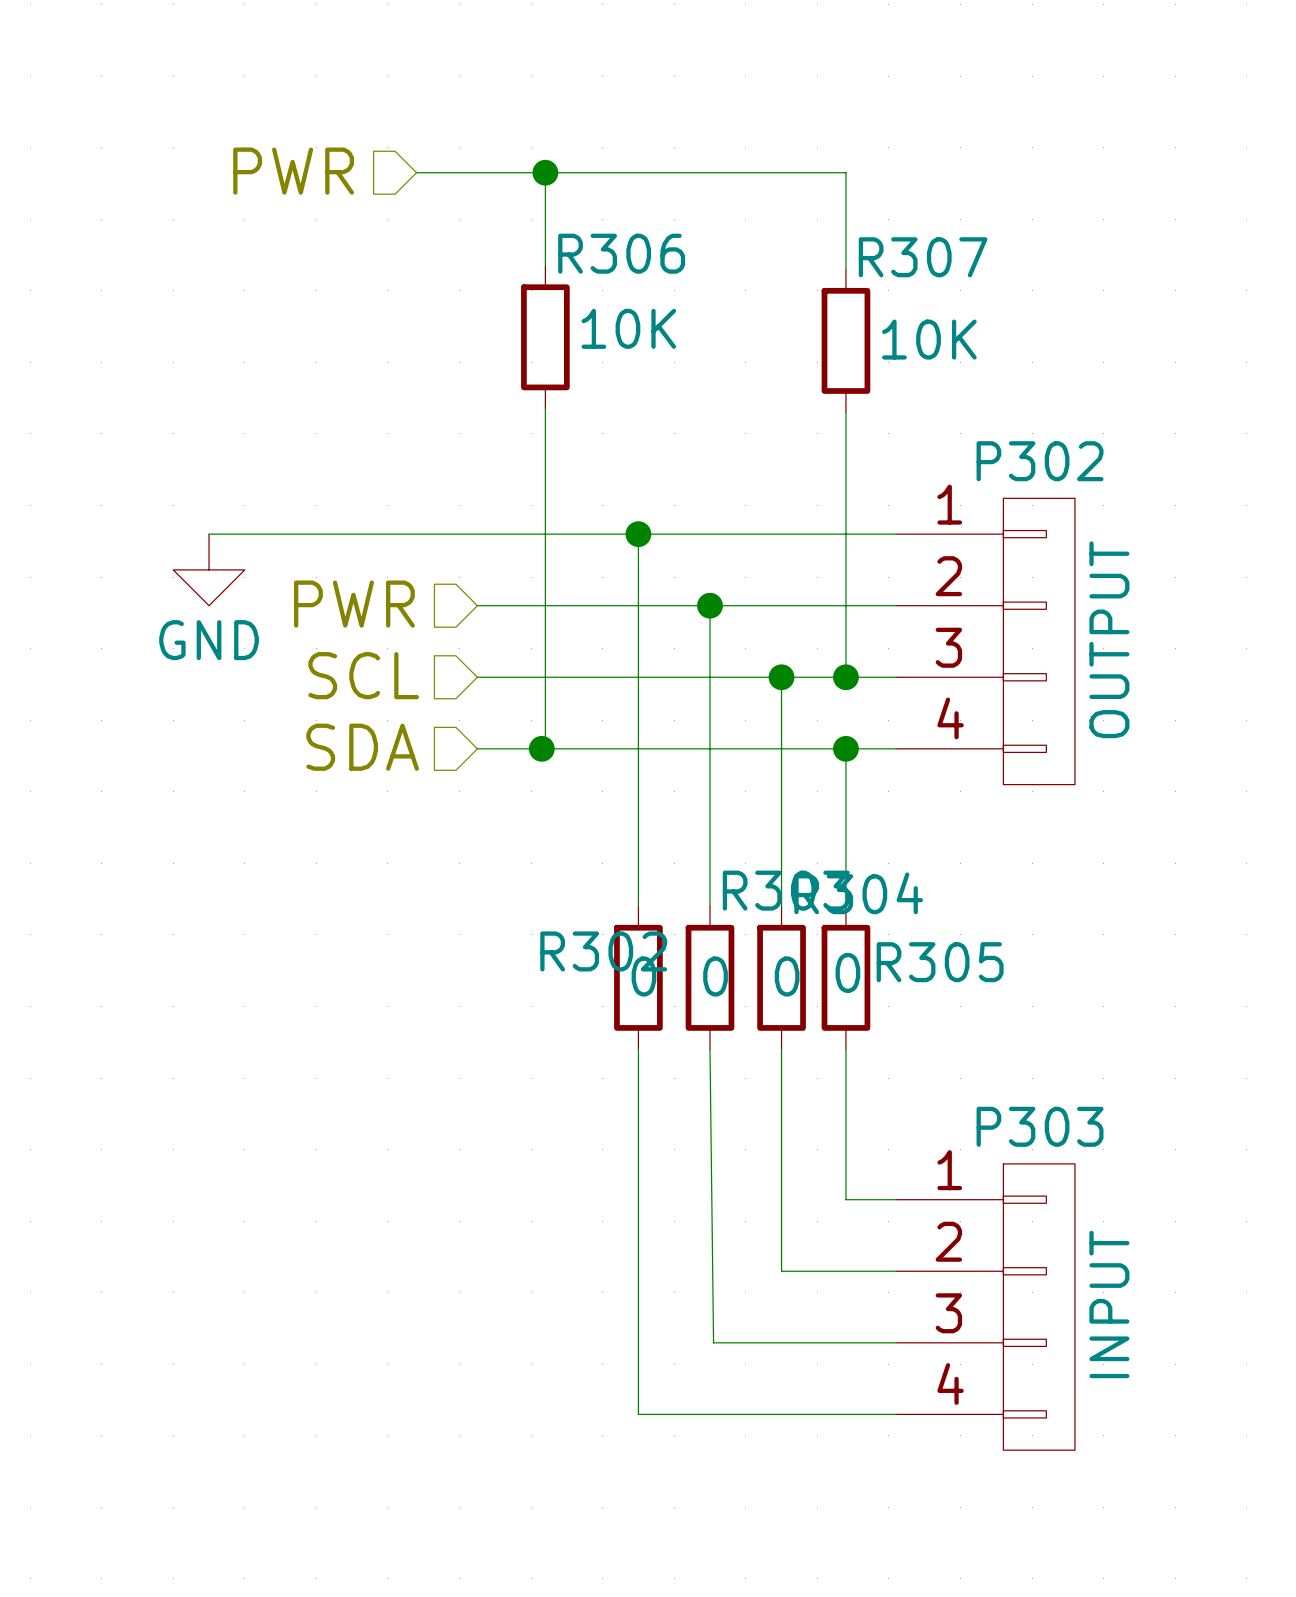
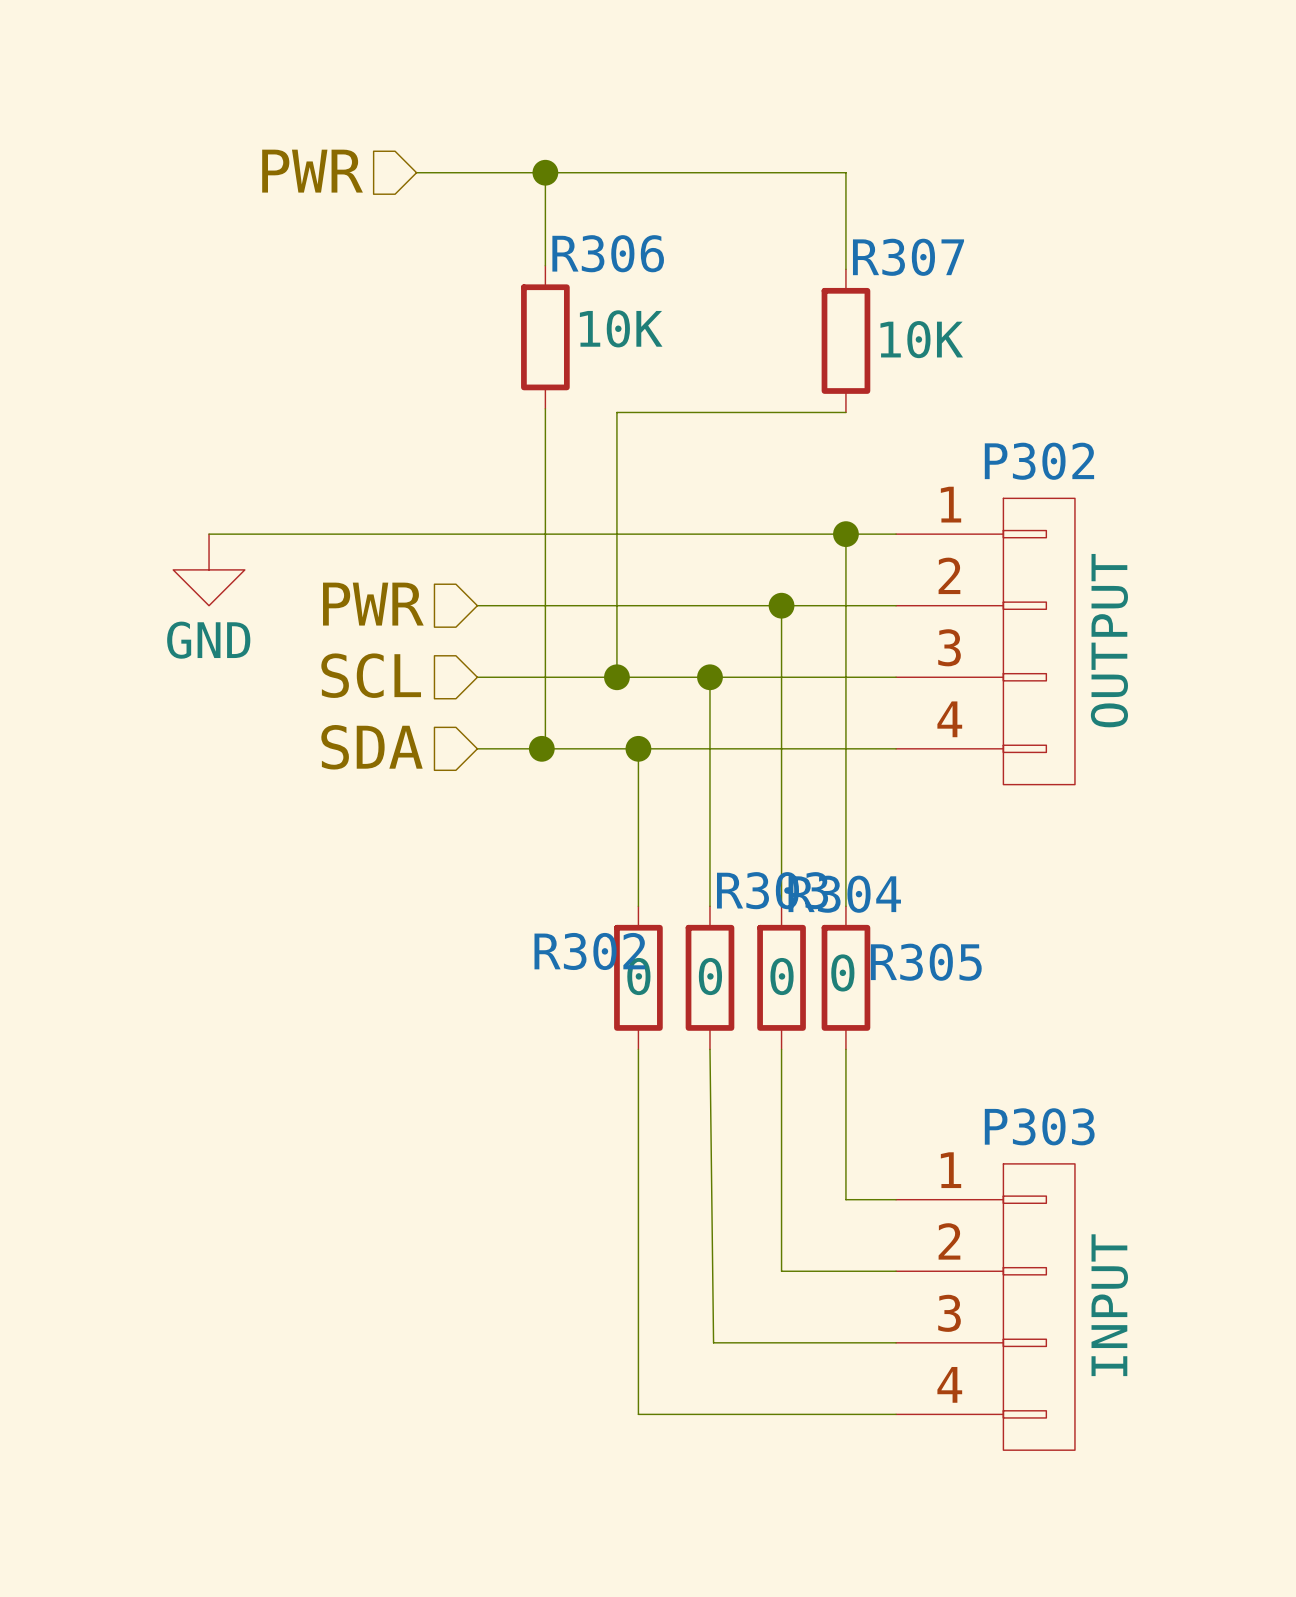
wire: (845, 412) (845, 534) -> (845, 412) (616, 412) (616, 677)
wire: (638, 534) (638, 748) -> none
junction: (638, 534) -> none
junction: none -> (845, 534)
wire: (709, 605) (709, 677) -> (781, 605) (781, 677)
junction: (709, 605) -> none
junction: none -> (781, 605)
junction: none -> (616, 677)
junction: none -> (709, 677)
junction: (781, 677) -> none
wire: none -> (845, 677) (845, 748)
junction: (845, 677) -> none
junction: none -> (638, 748)
junction: (845, 748) -> none

